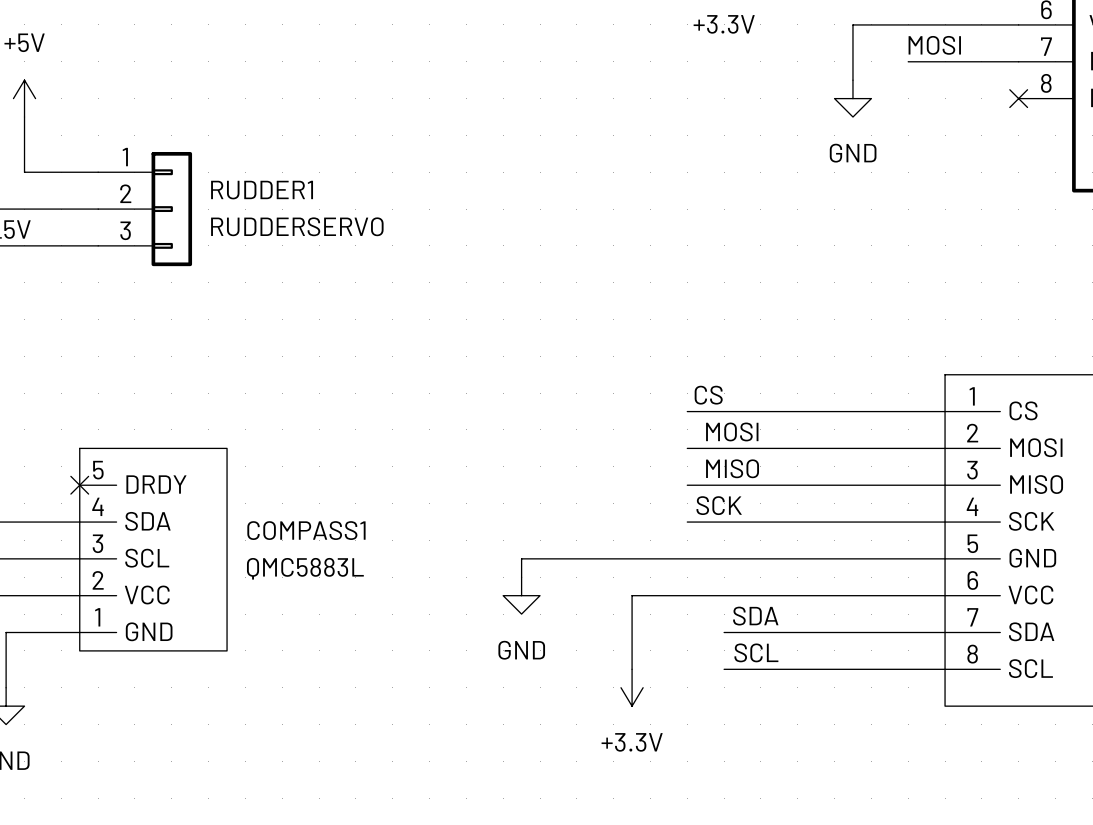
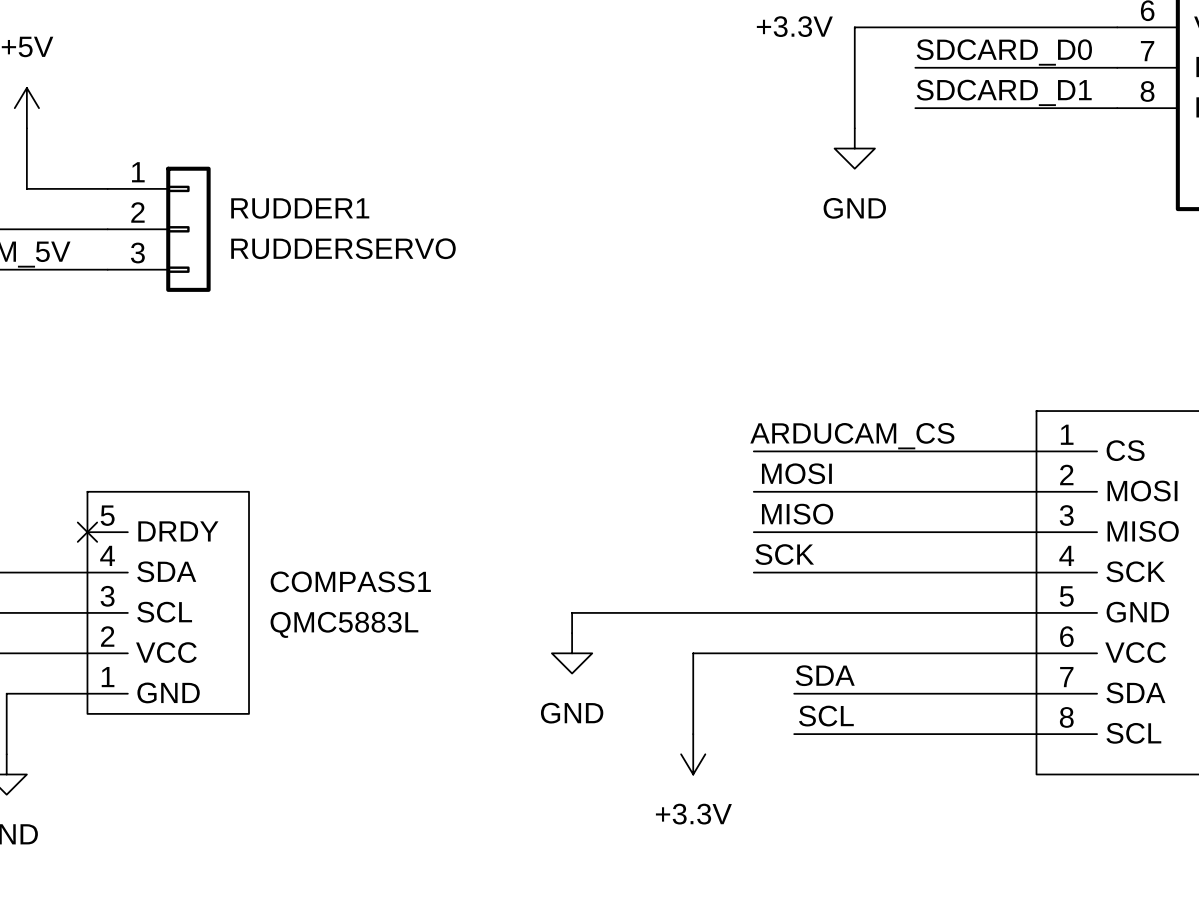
wire: (852, 24) (852, 80) -> (935, 27) (854, 27) (854, 128)
label: none -> SDCARD_D0 (1004, 52)
label: MOSI (934, 45) -> none
wire: none -> (915, 67) (996, 67)
label: none -> SDCARD_D1 (1004, 92)
wire: none -> (915, 108) (1117, 108)
power symbol position: GND (852, 98) -> GND (854, 148)
no-connect mark: (1018, 98) -> none
label: CS (708, 395) -> none
label: none -> ARDUCAM_CS (852, 436)

